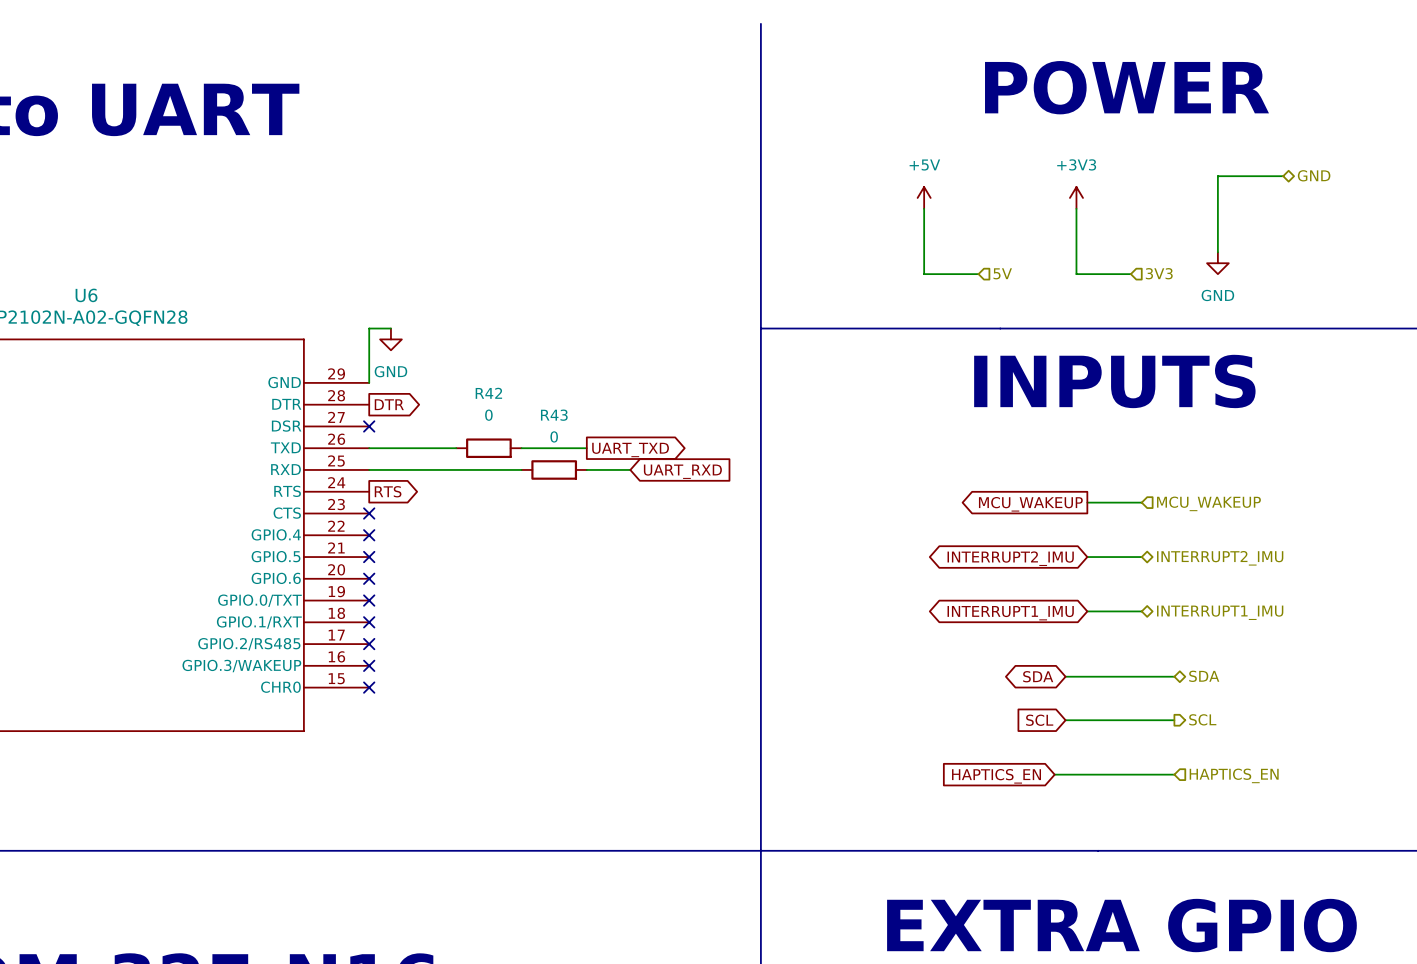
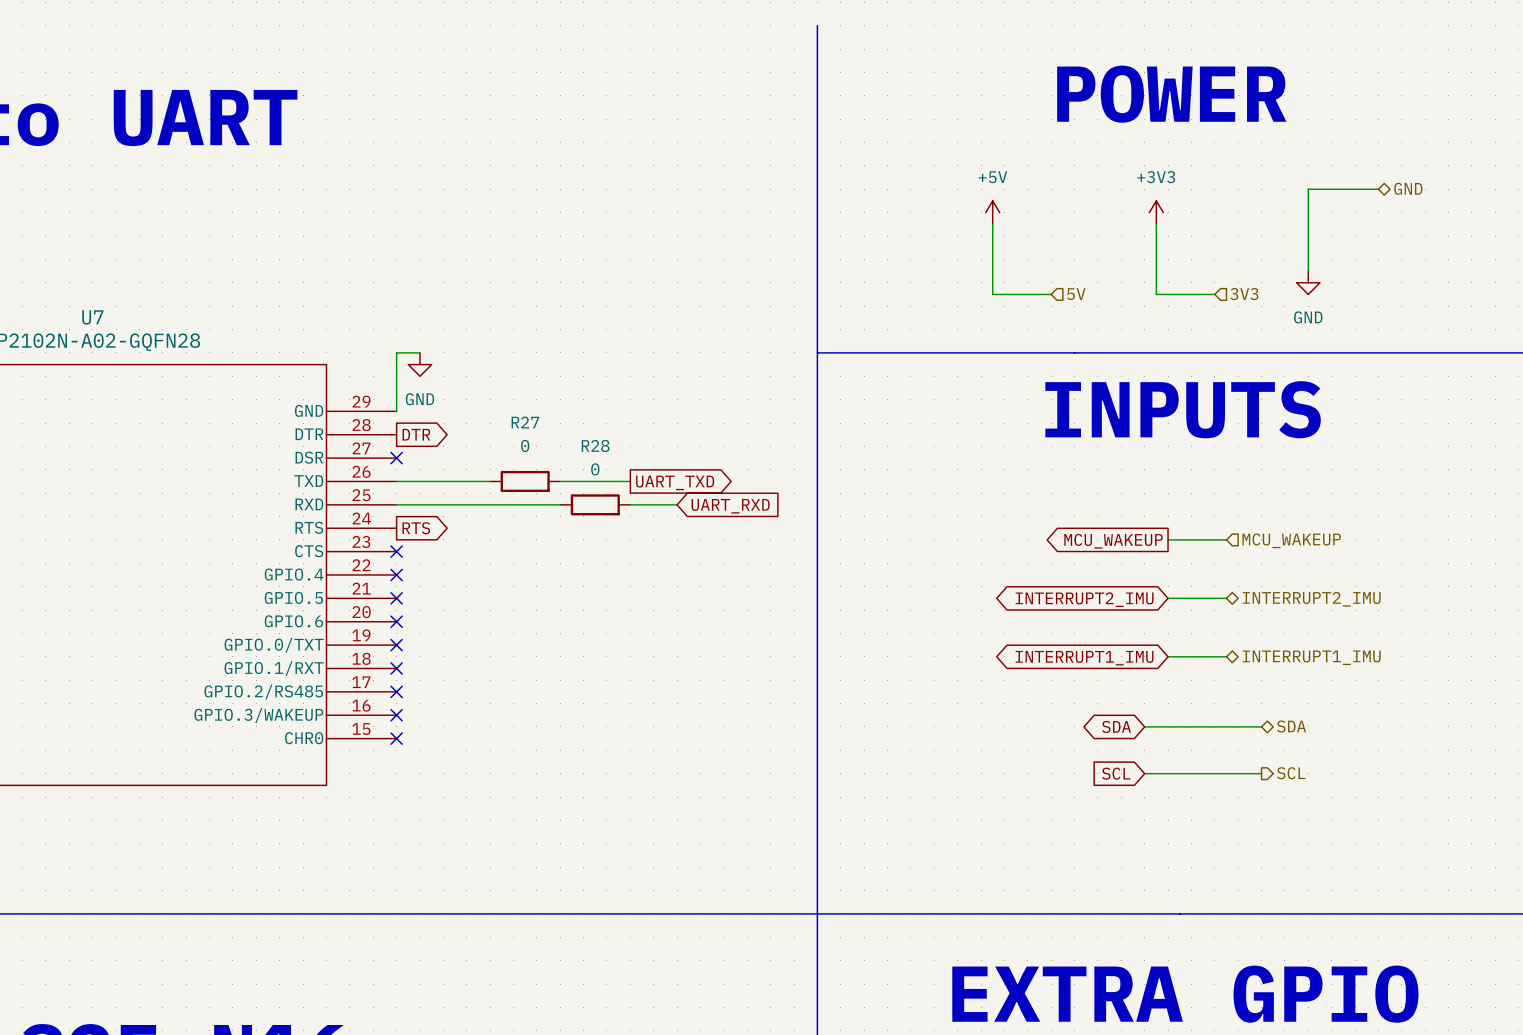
U6 name: U6 (86, 295) -> U7 (92, 317)
R42 name: R42 (488, 393) -> R27 (525, 422)
R43 name: R43 (554, 415) -> R28 (595, 445)
wire: (1054, 774) (1174, 774) -> none
hierarchical label: HAPTICS_EN (1234, 775) -> none
global label: HAPTICS_EN (996, 776) -> none

